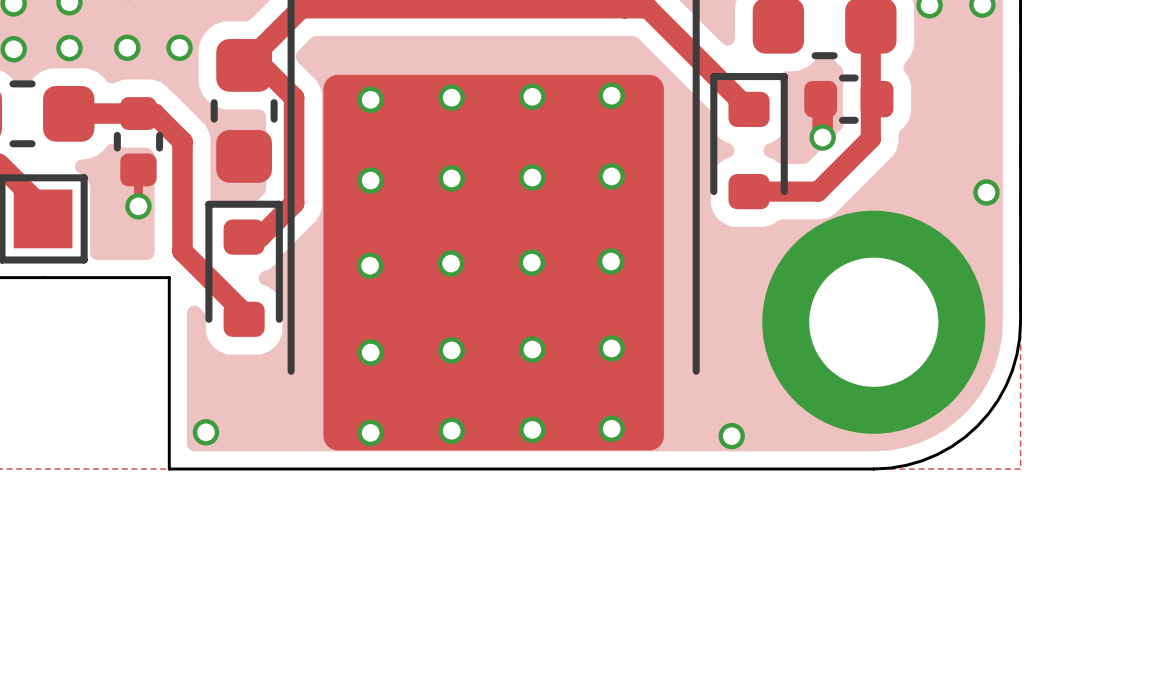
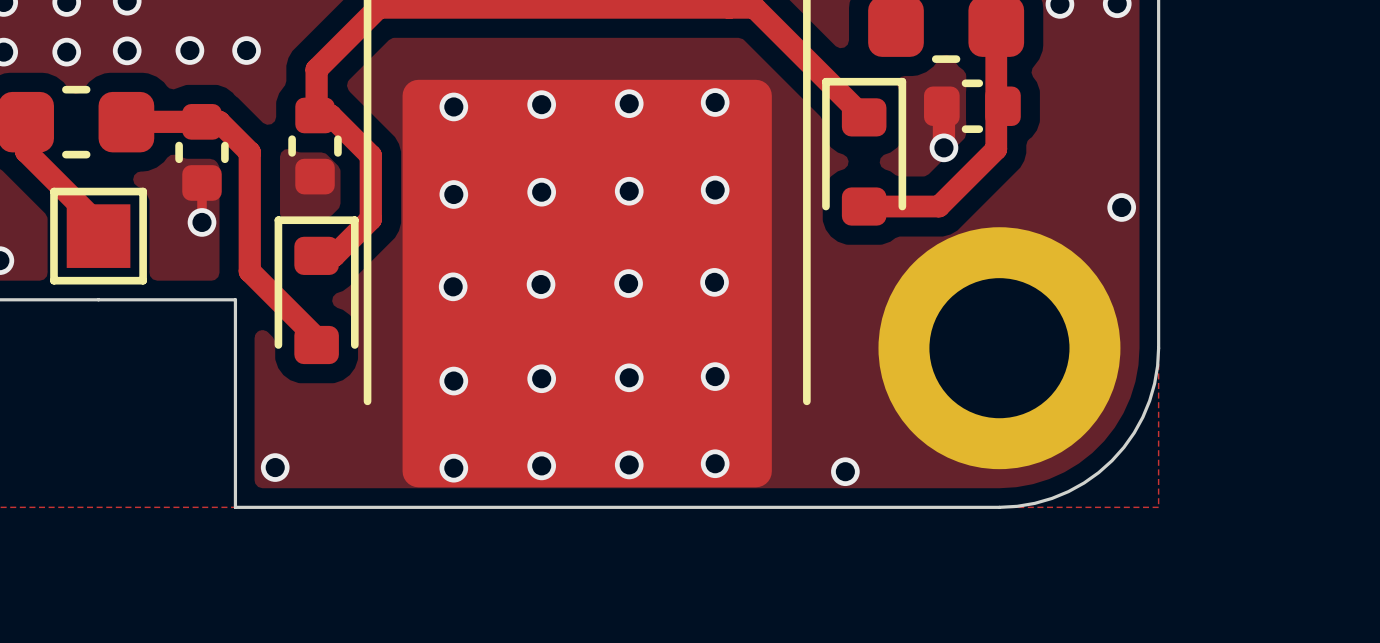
part footprint: [210, 38, 278, 183] -> [288, 97, 342, 195]
track: (244, 65) (261, 65) (294, 97) (294, 144) -> (316, 69) (316, 113) (315, 115) (330, 115) (370, 155)

